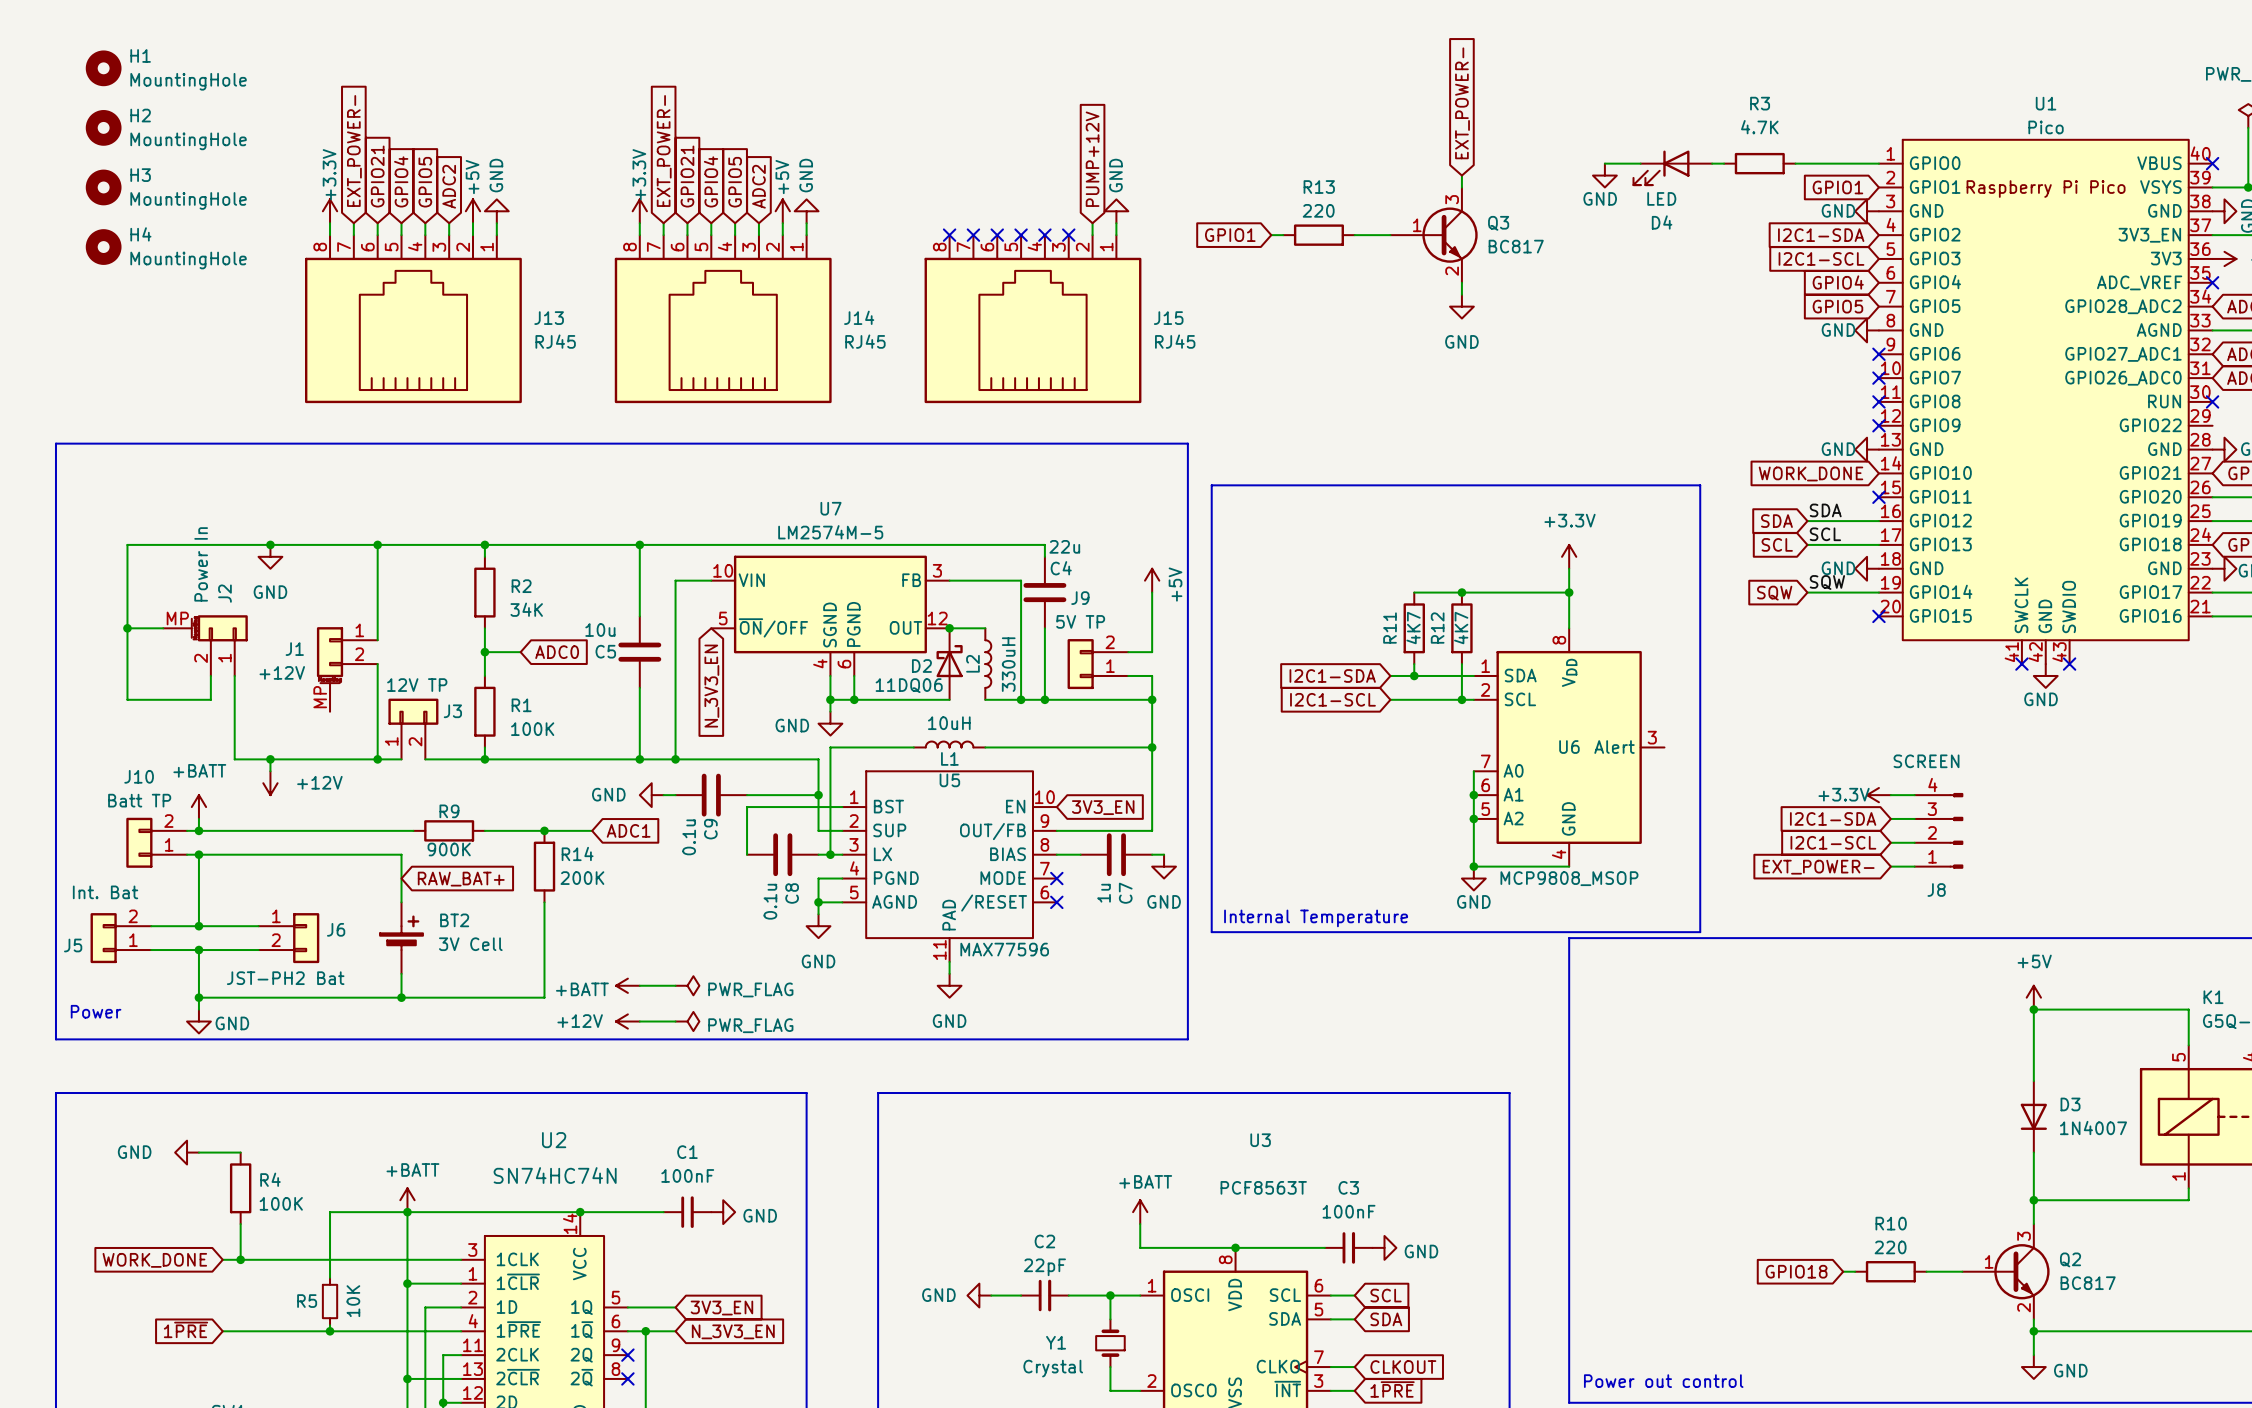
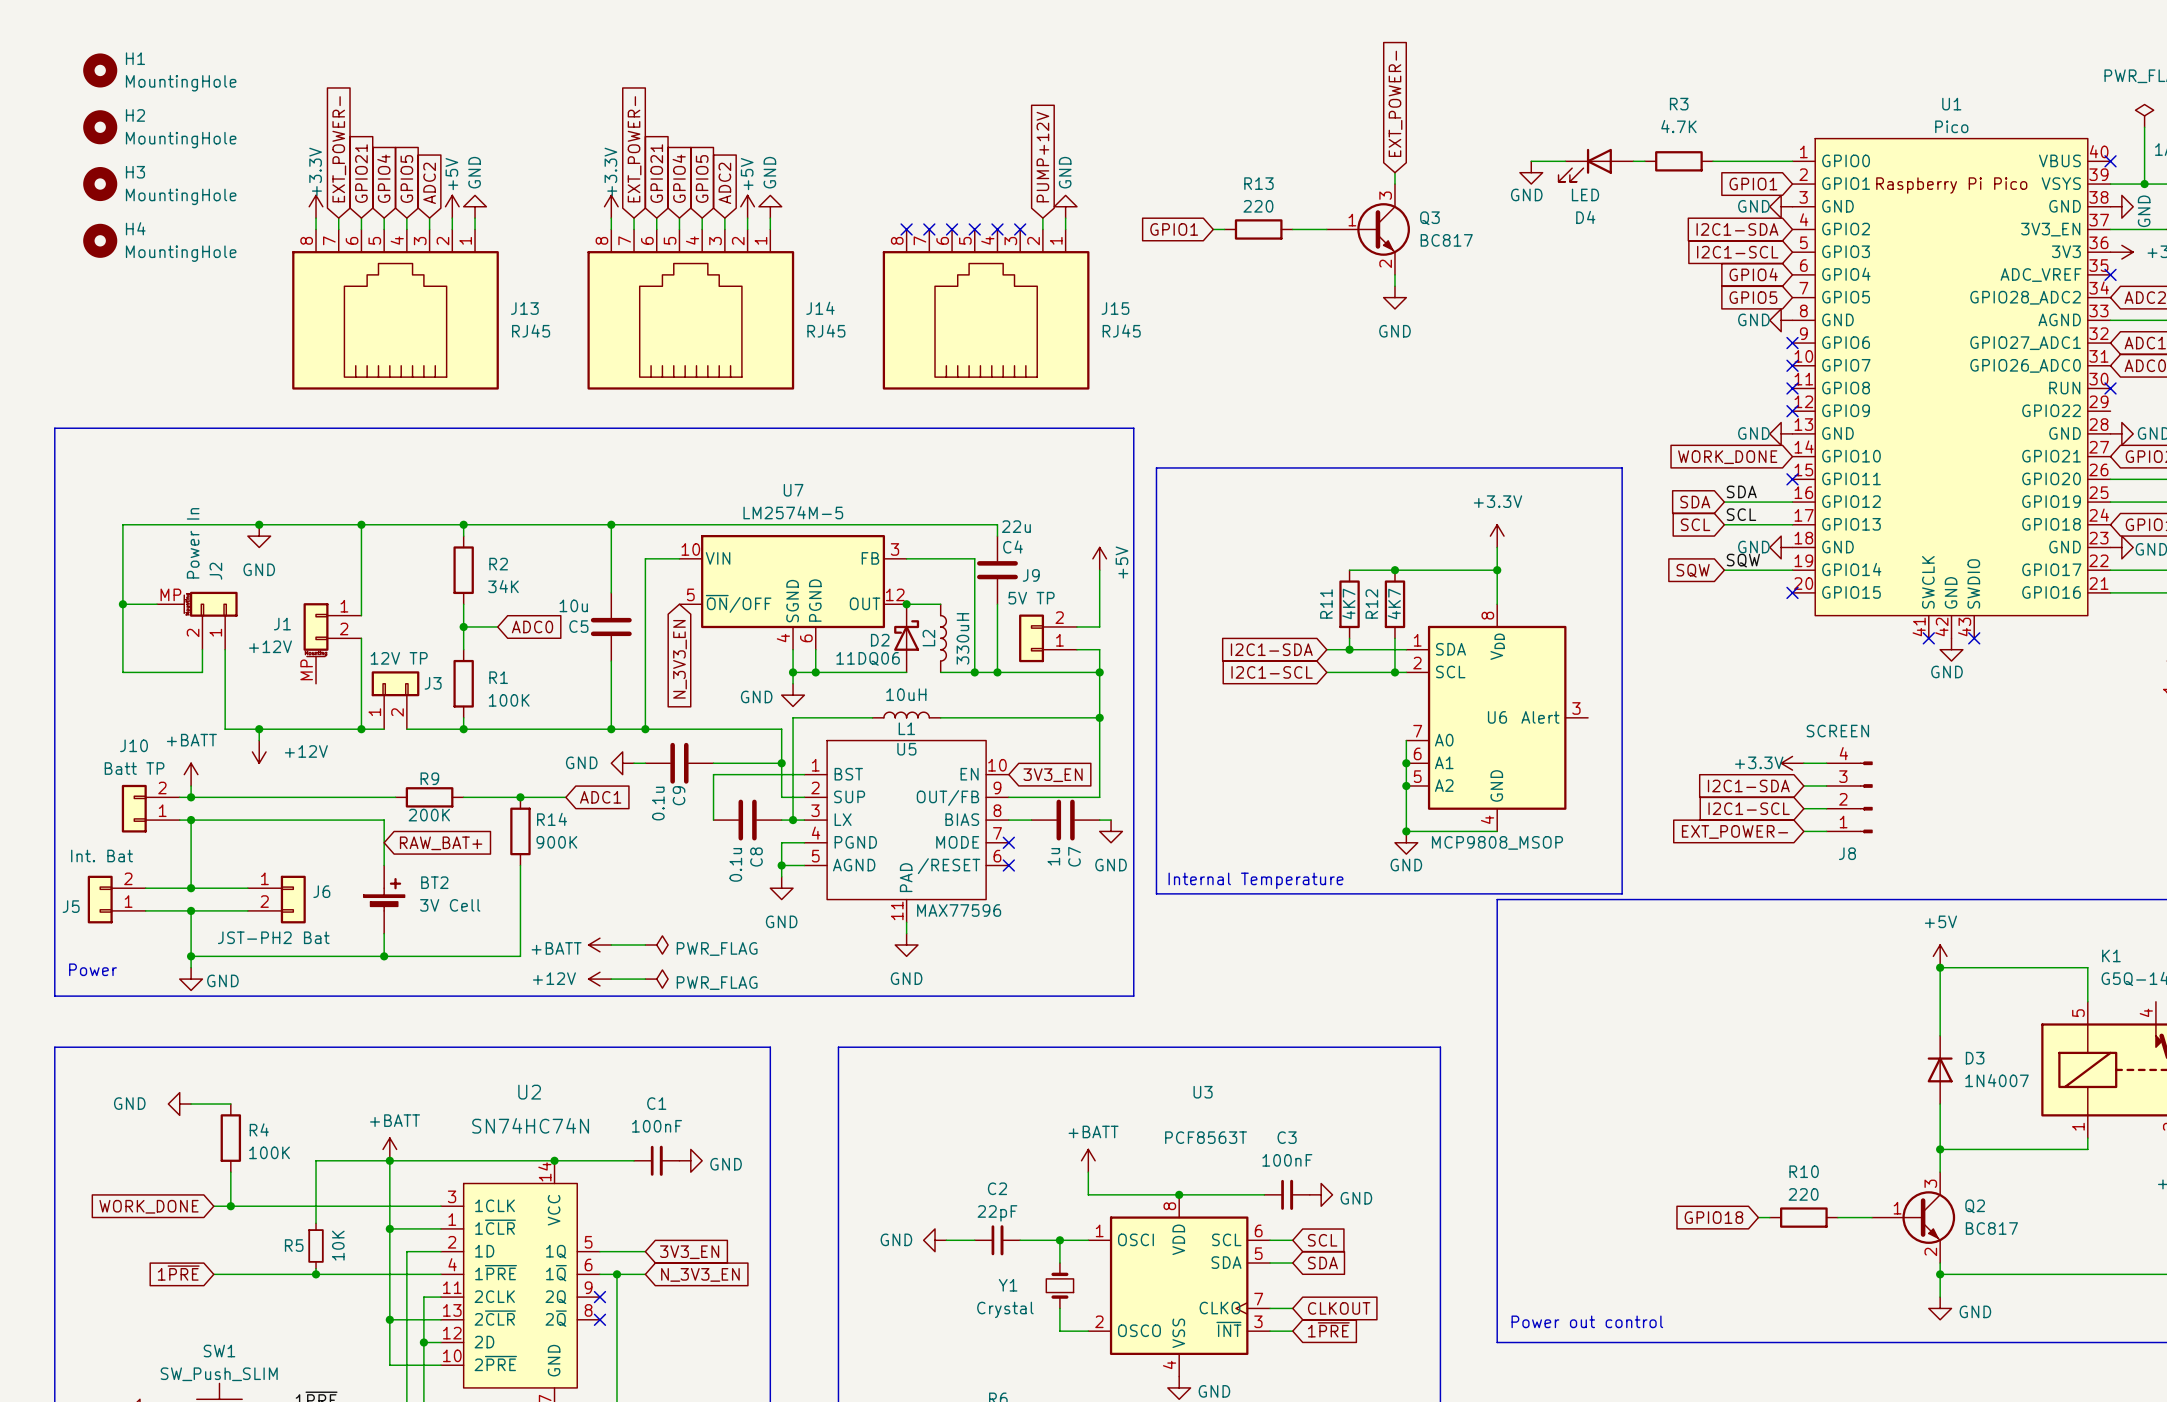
R9 value: 900K (449, 849) -> 200K (429, 815)
R14 value: 200K (582, 878) -> 900K (556, 842)
D3 rotation: 0° (2033, 1116) -> 180° (1940, 1069)

